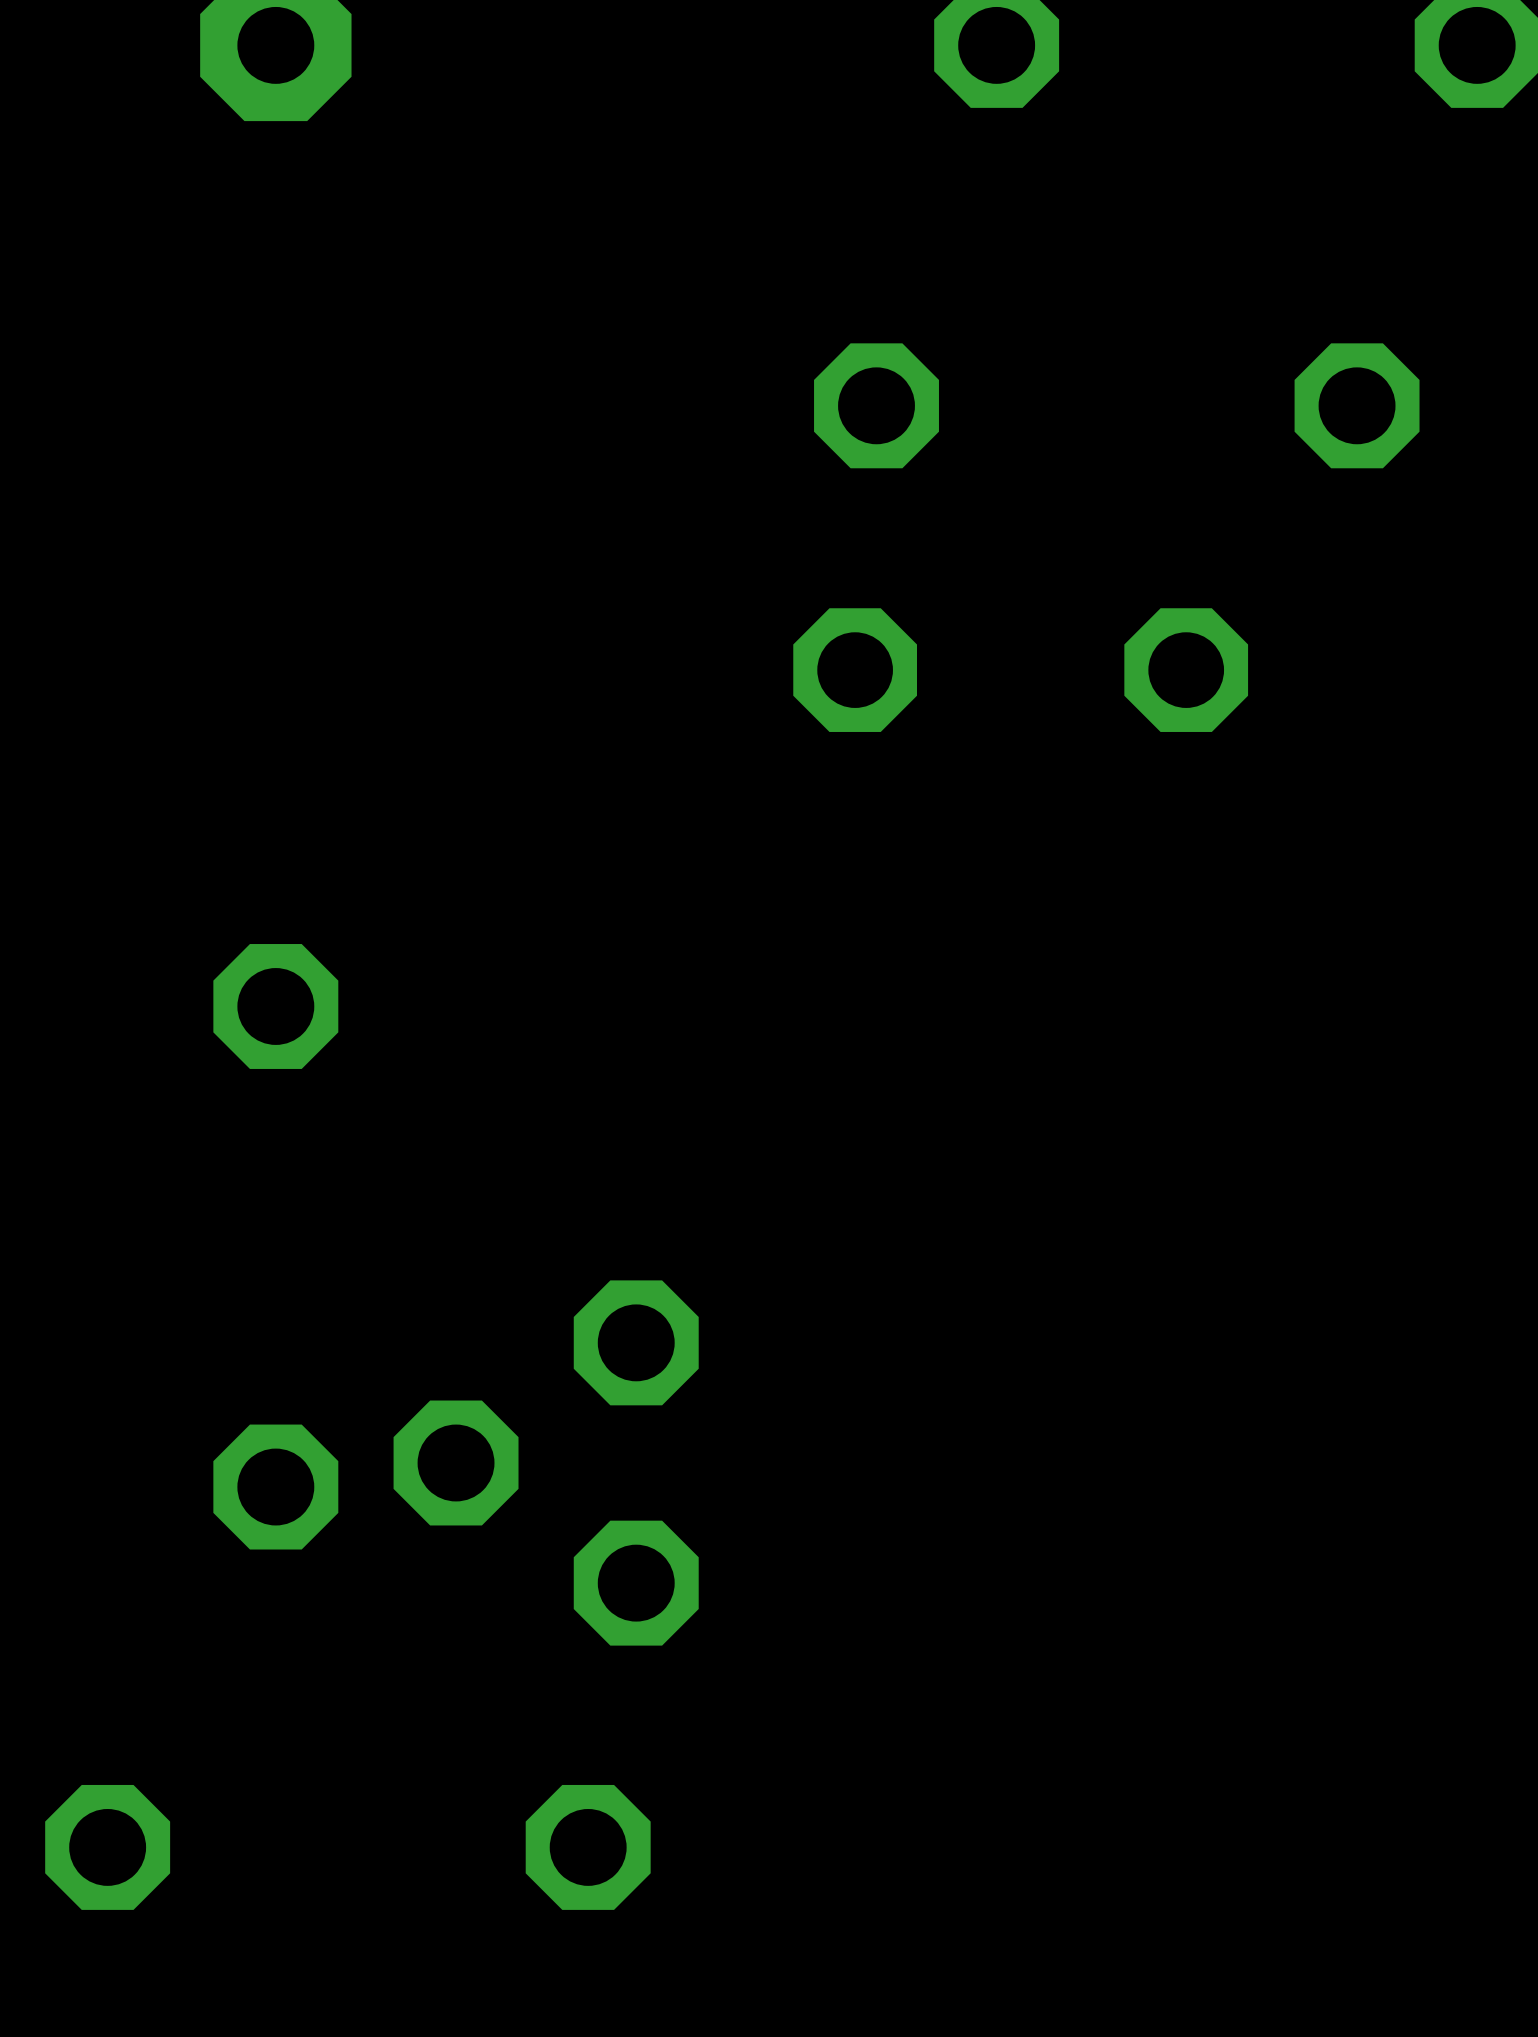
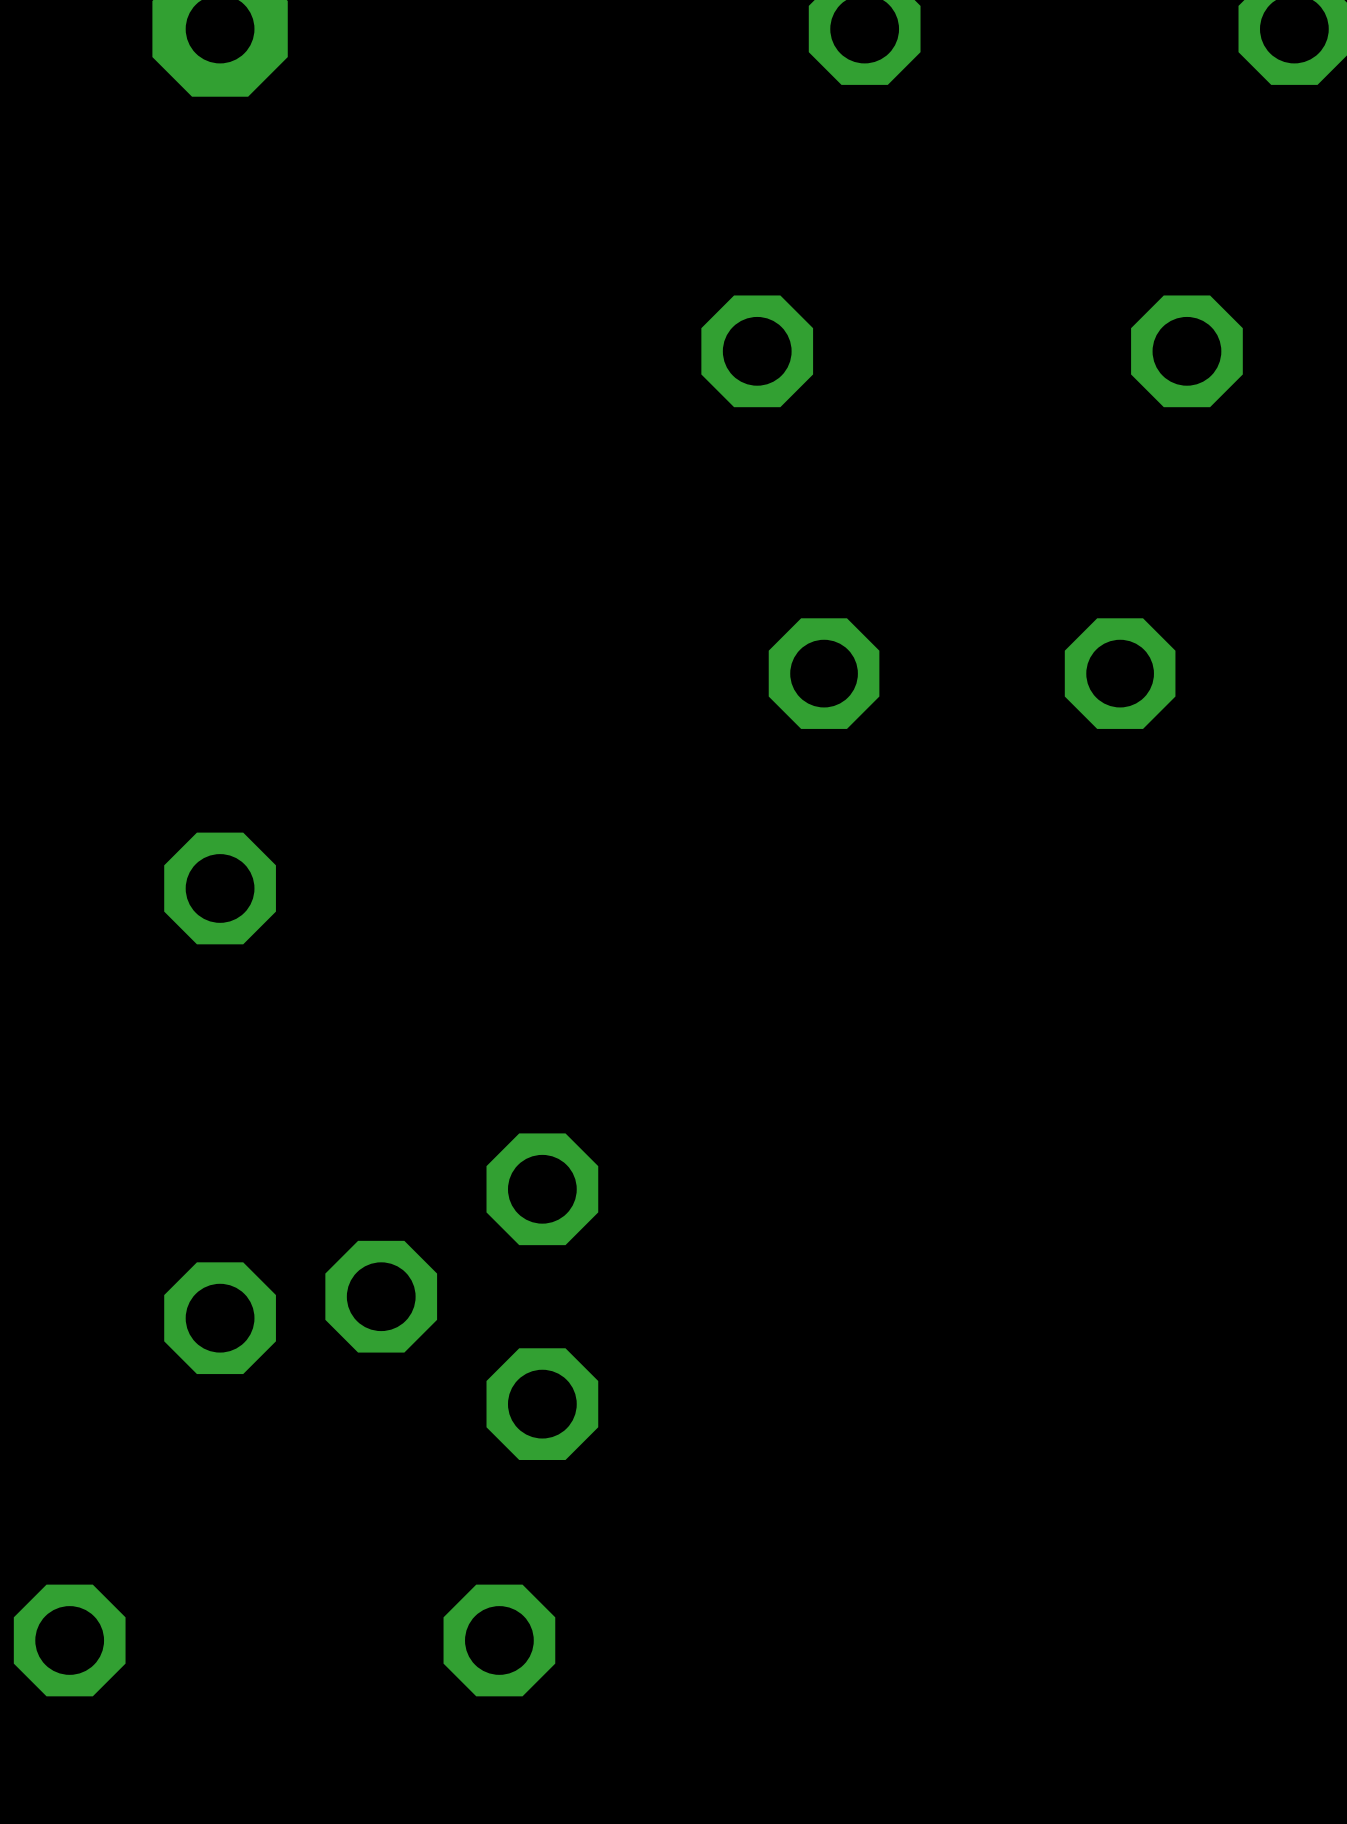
part position: (1020, 670) -> (972, 673)

